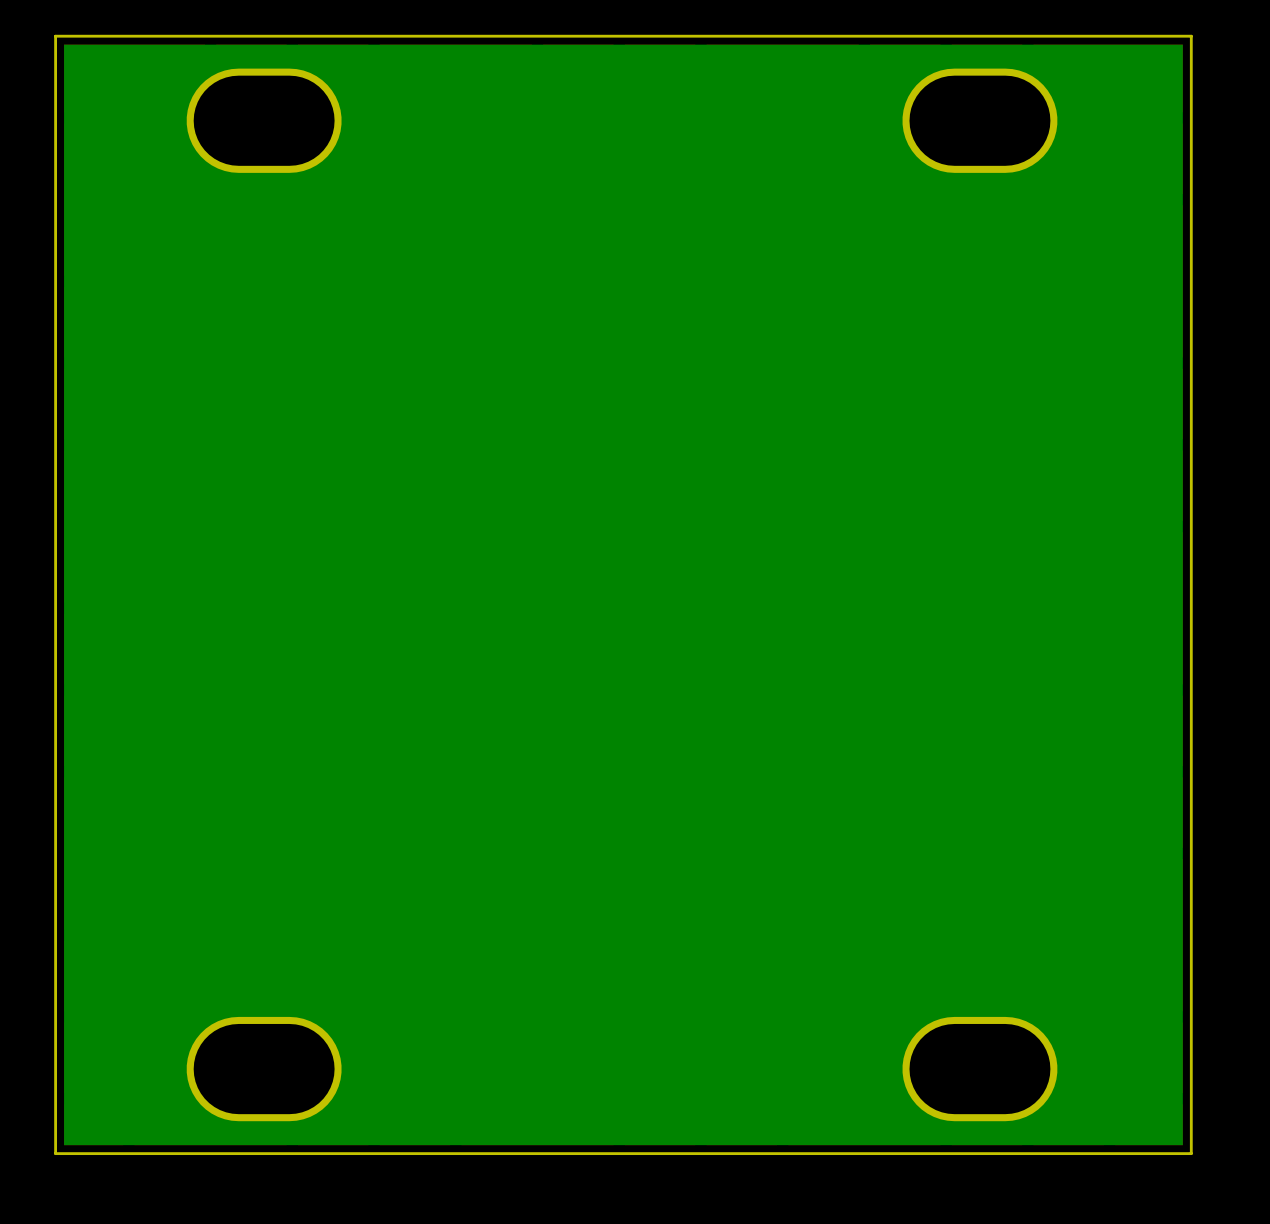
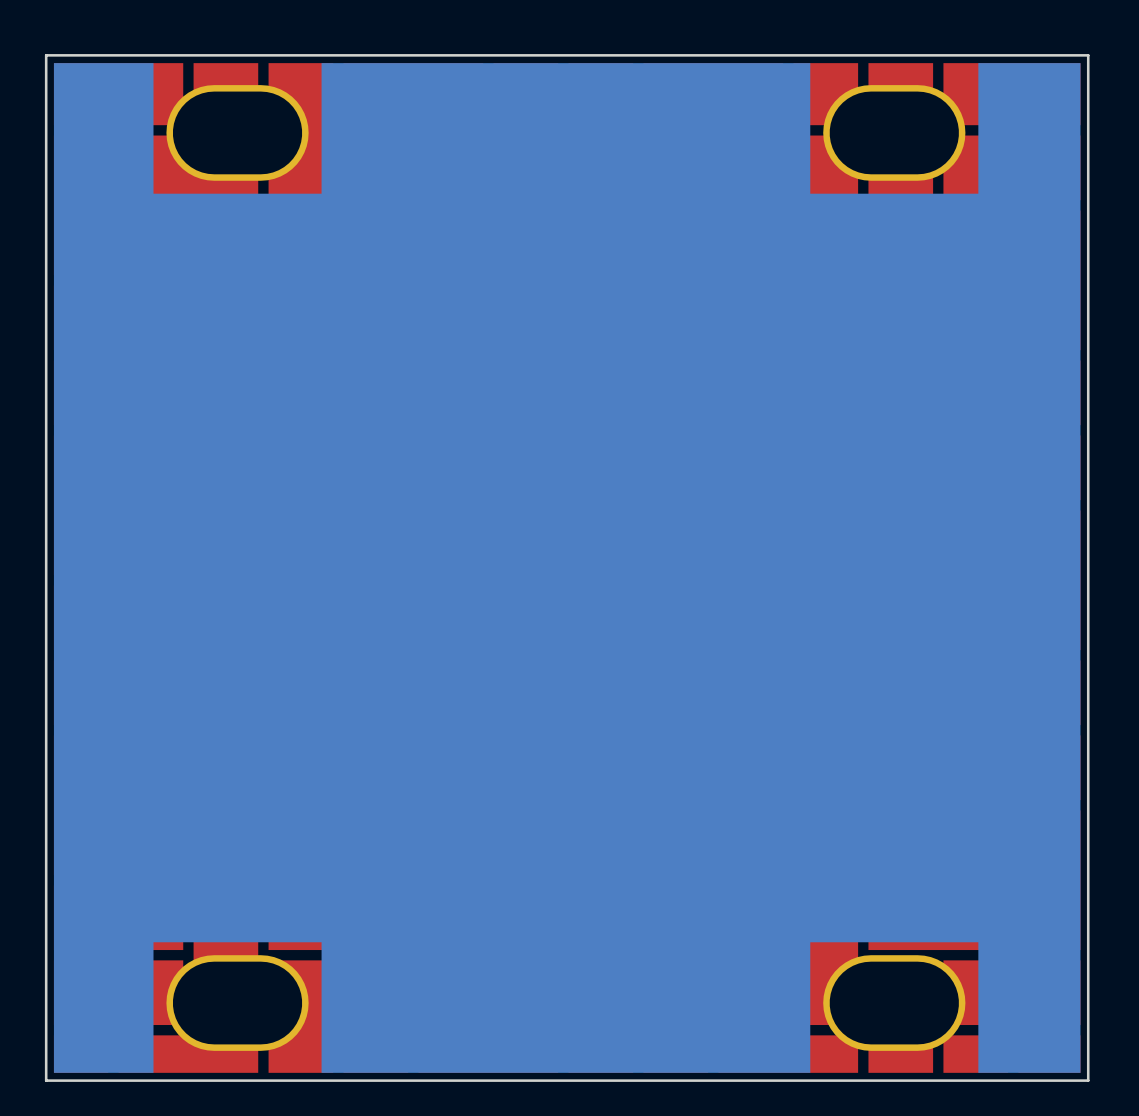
drawing shape: [64, 44, 1183, 1146] -> [153, 193, 979, 943]
drawing: none -> [53, 63, 154, 1073]
drawing: none -> [321, 63, 811, 194]
drawing: none -> [978, 63, 1081, 1073]
drawing: none -> [321, 942, 811, 1073]

